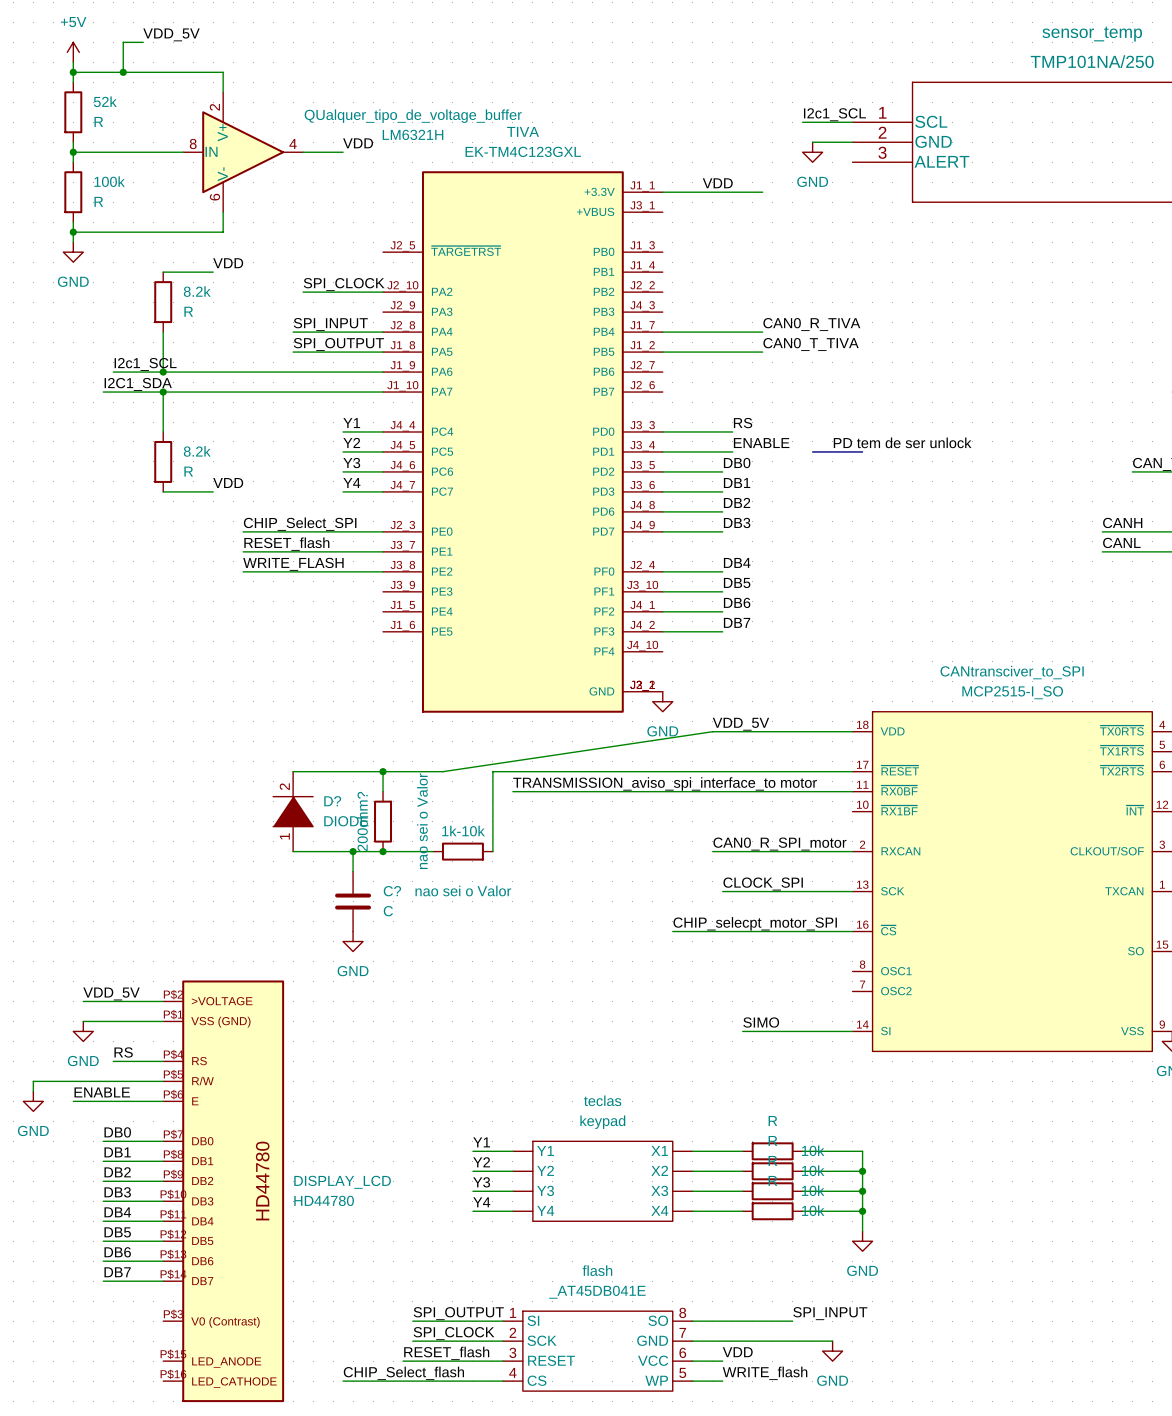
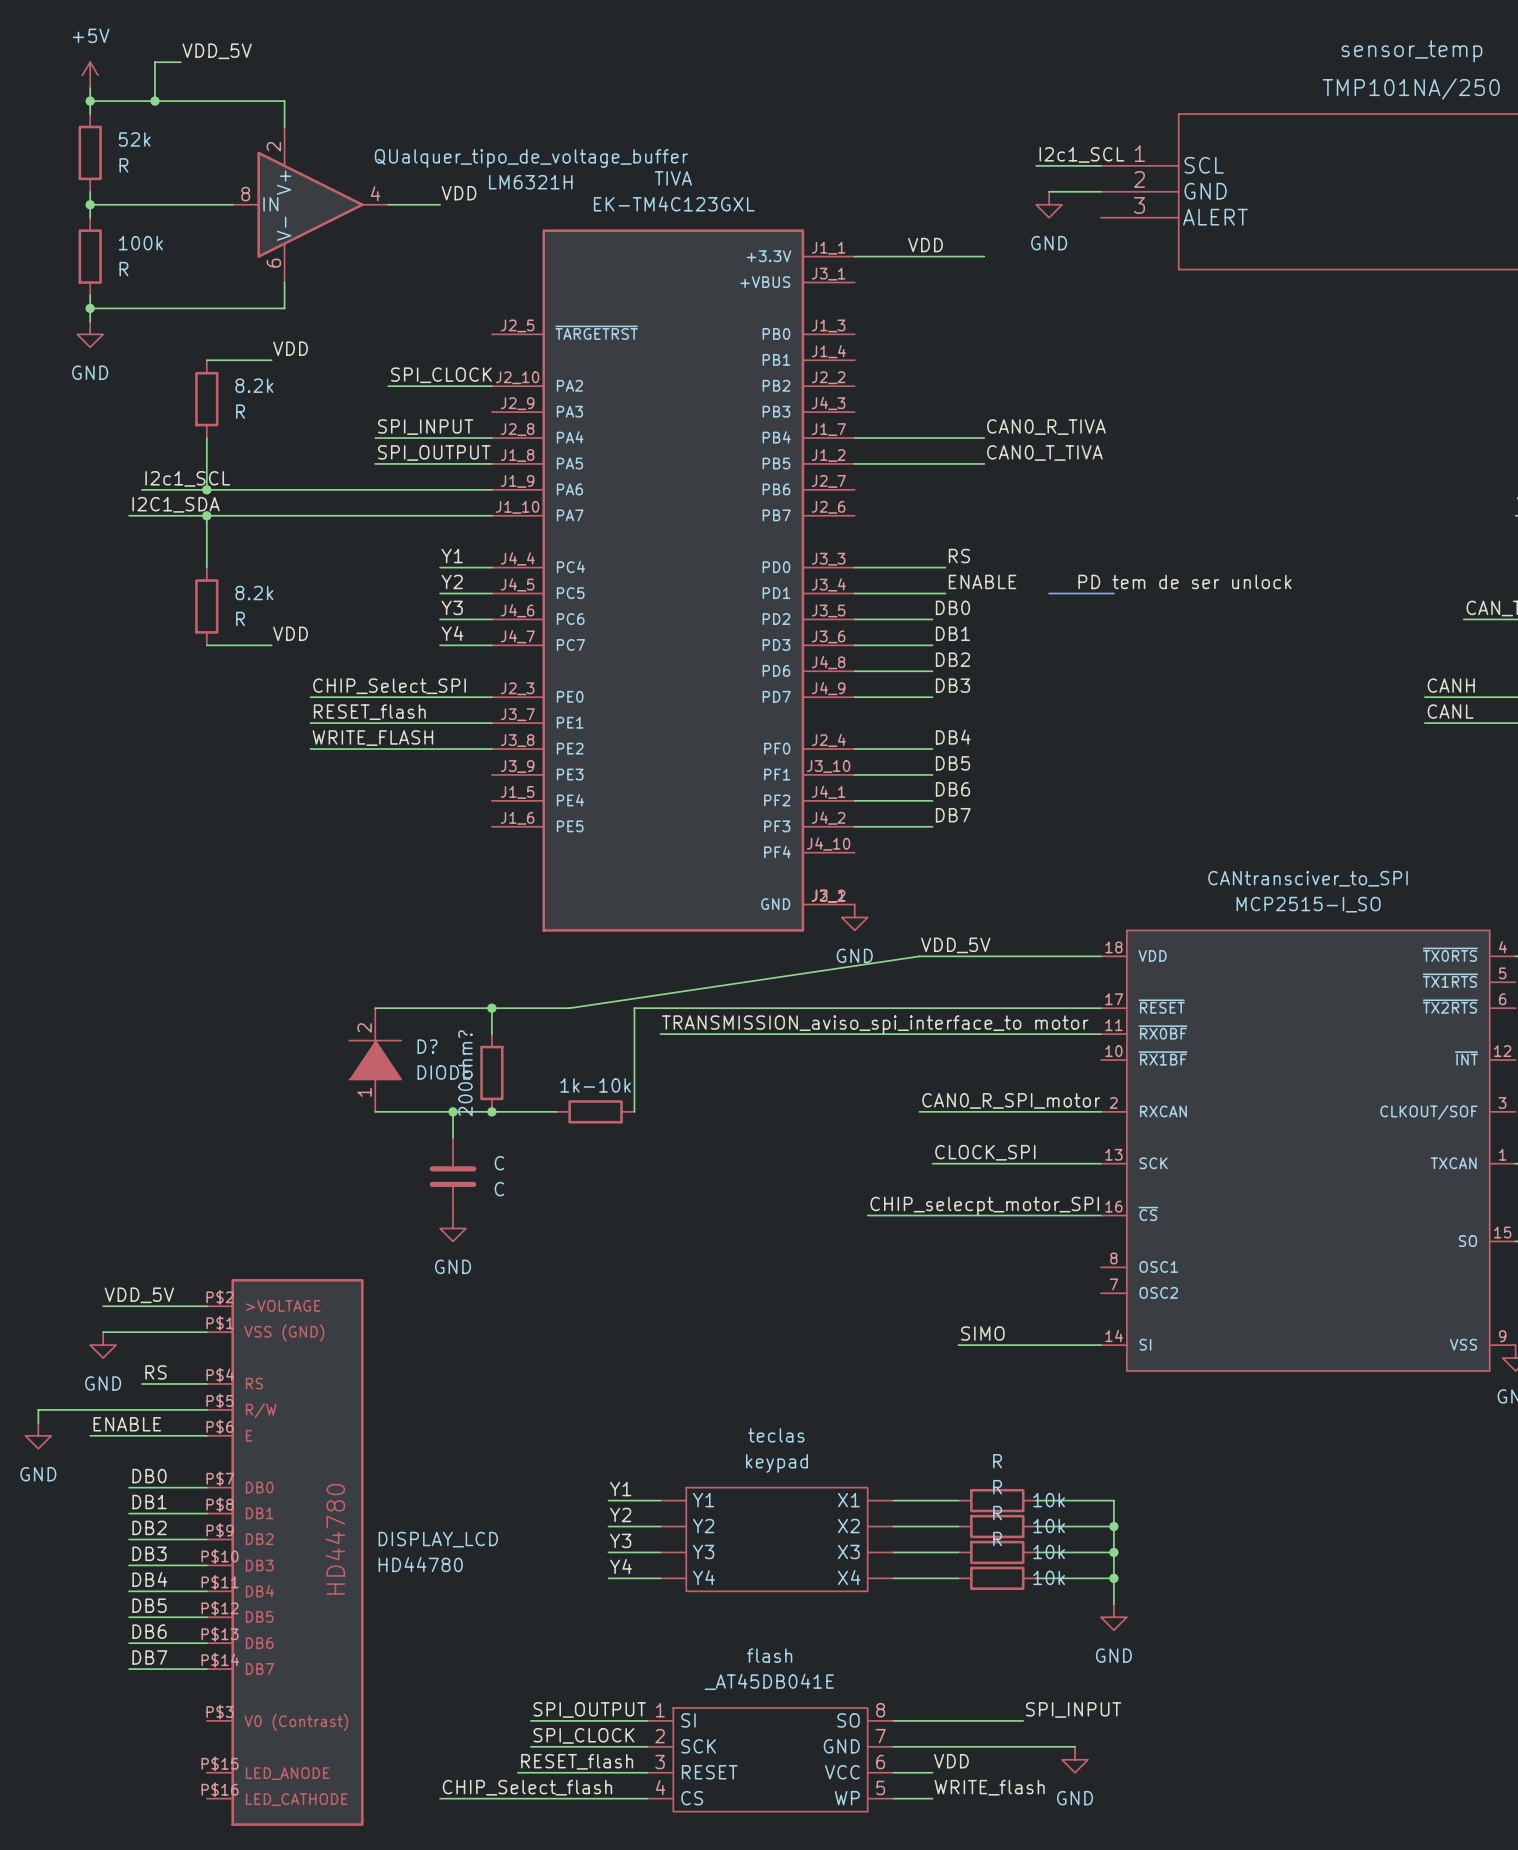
200ohm? value: nao sei o Valor (422, 821) -> none
1k-10k value: nao sei o Valor (463, 890) -> none
C? name: C? (392, 891) -> C (499, 1163)

